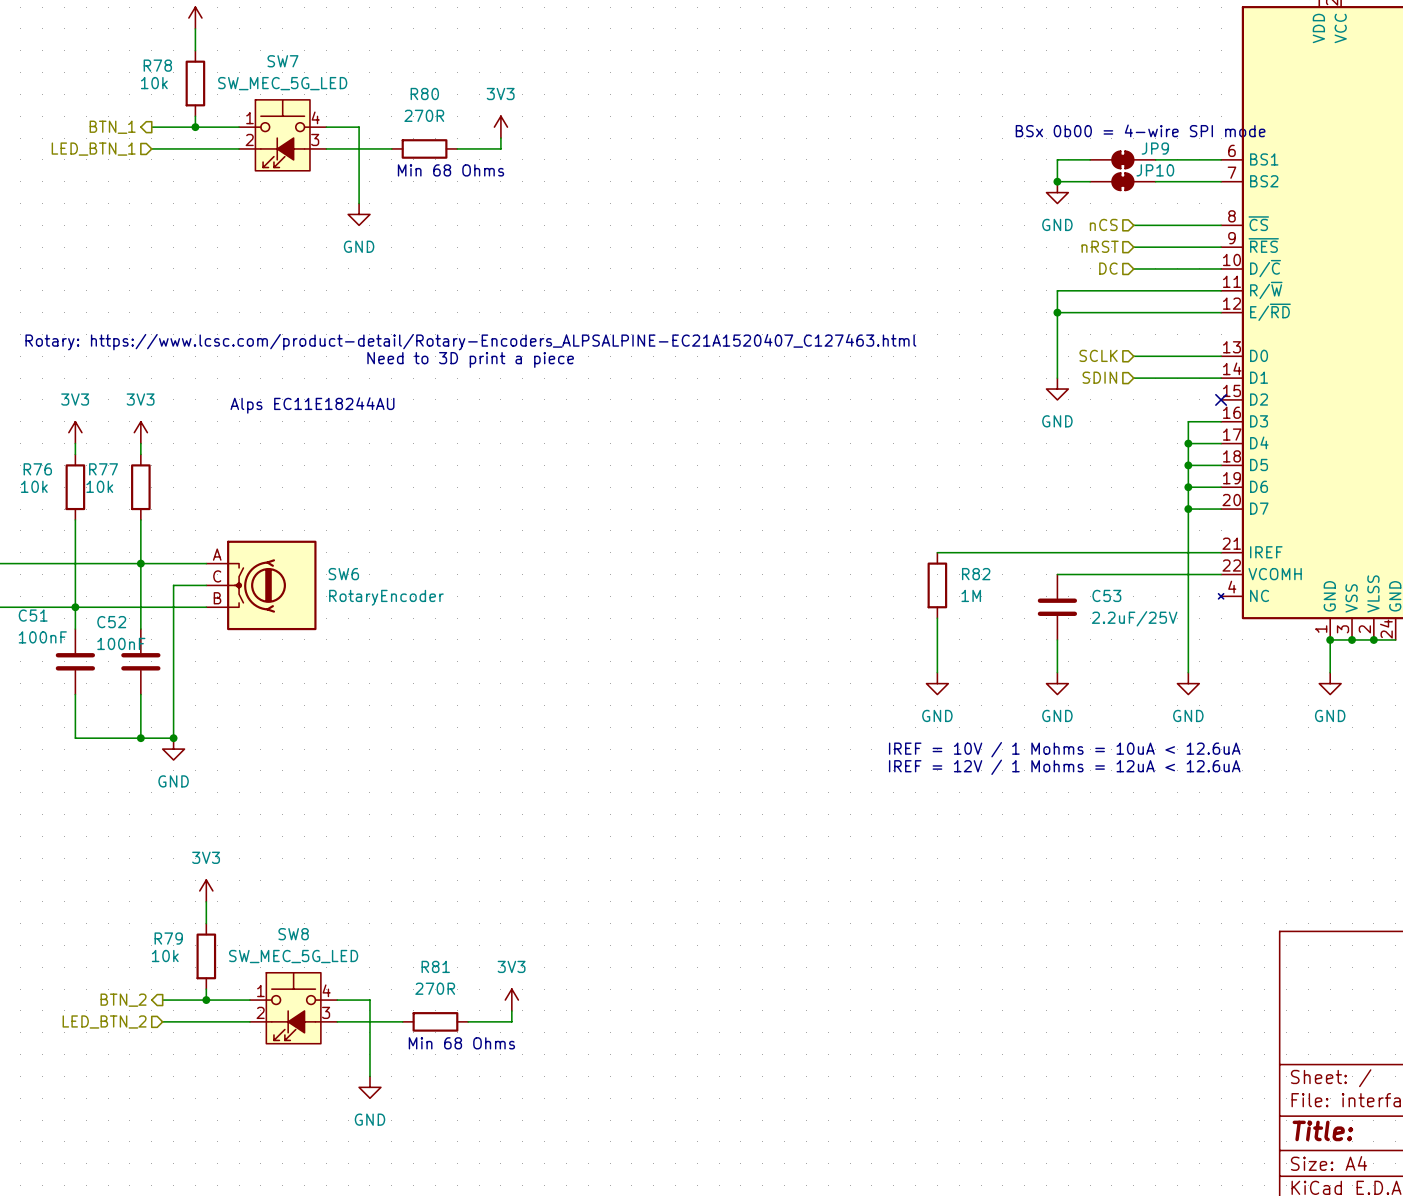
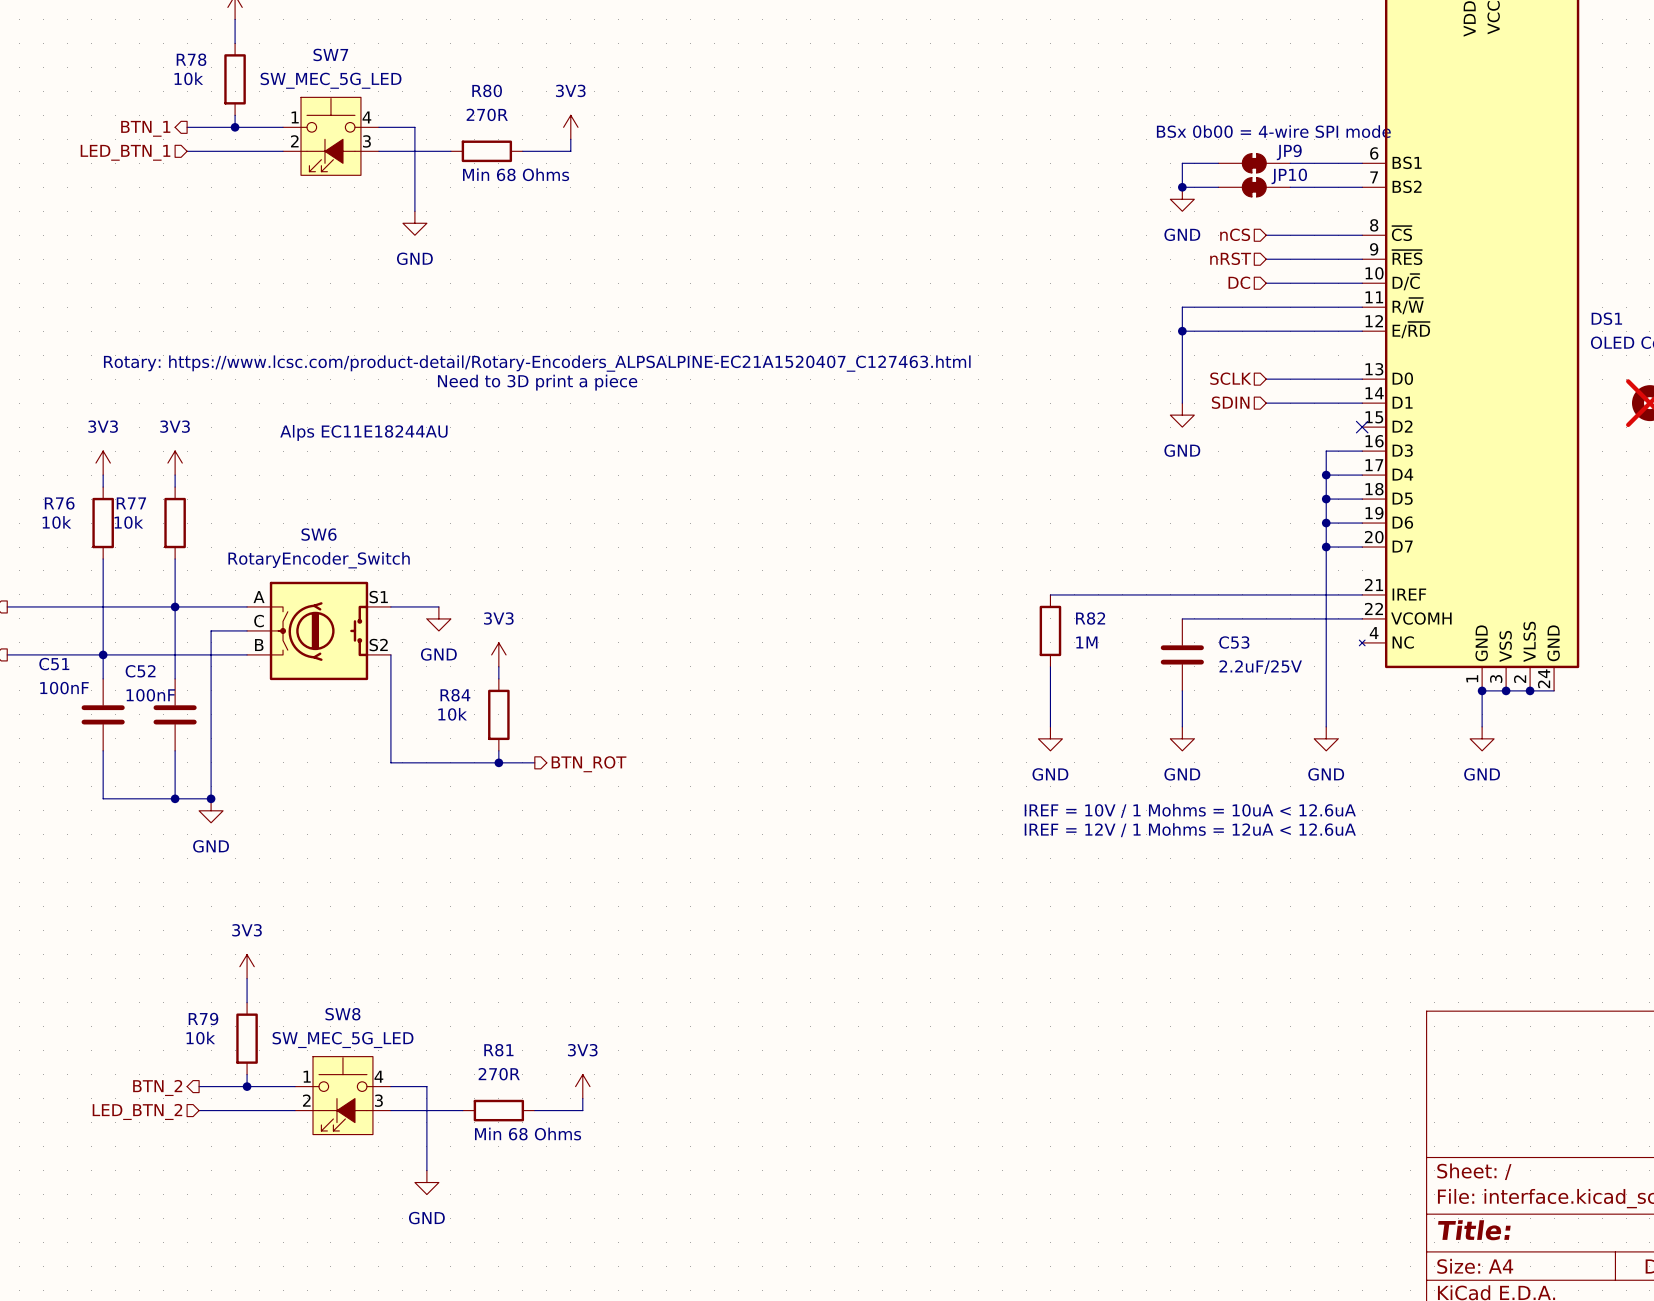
SW6 symbol: [206, 540, 317, 631] -> [247, 581, 391, 681]
wire: none -> (390, 606) (438, 606)
SW6 name position: SW6 (343, 574) -> SW6 (319, 534)
power symbol: none -> GND (438, 618)
SW6 value: RotaryEncoder (386, 597) -> RotaryEncoder_Switch (319, 560)
wire: none -> (390, 654) (390, 762) (534, 762)
power symbol: none -> 3V3 (498, 654)
wire: none -> (498, 666) (498, 678)
R84: none -> 10k (498, 714)
wire: none -> (498, 750) (498, 762)
junction: none -> (498, 762)
hierarchical label: none -> BTN_ROT (589, 764)

